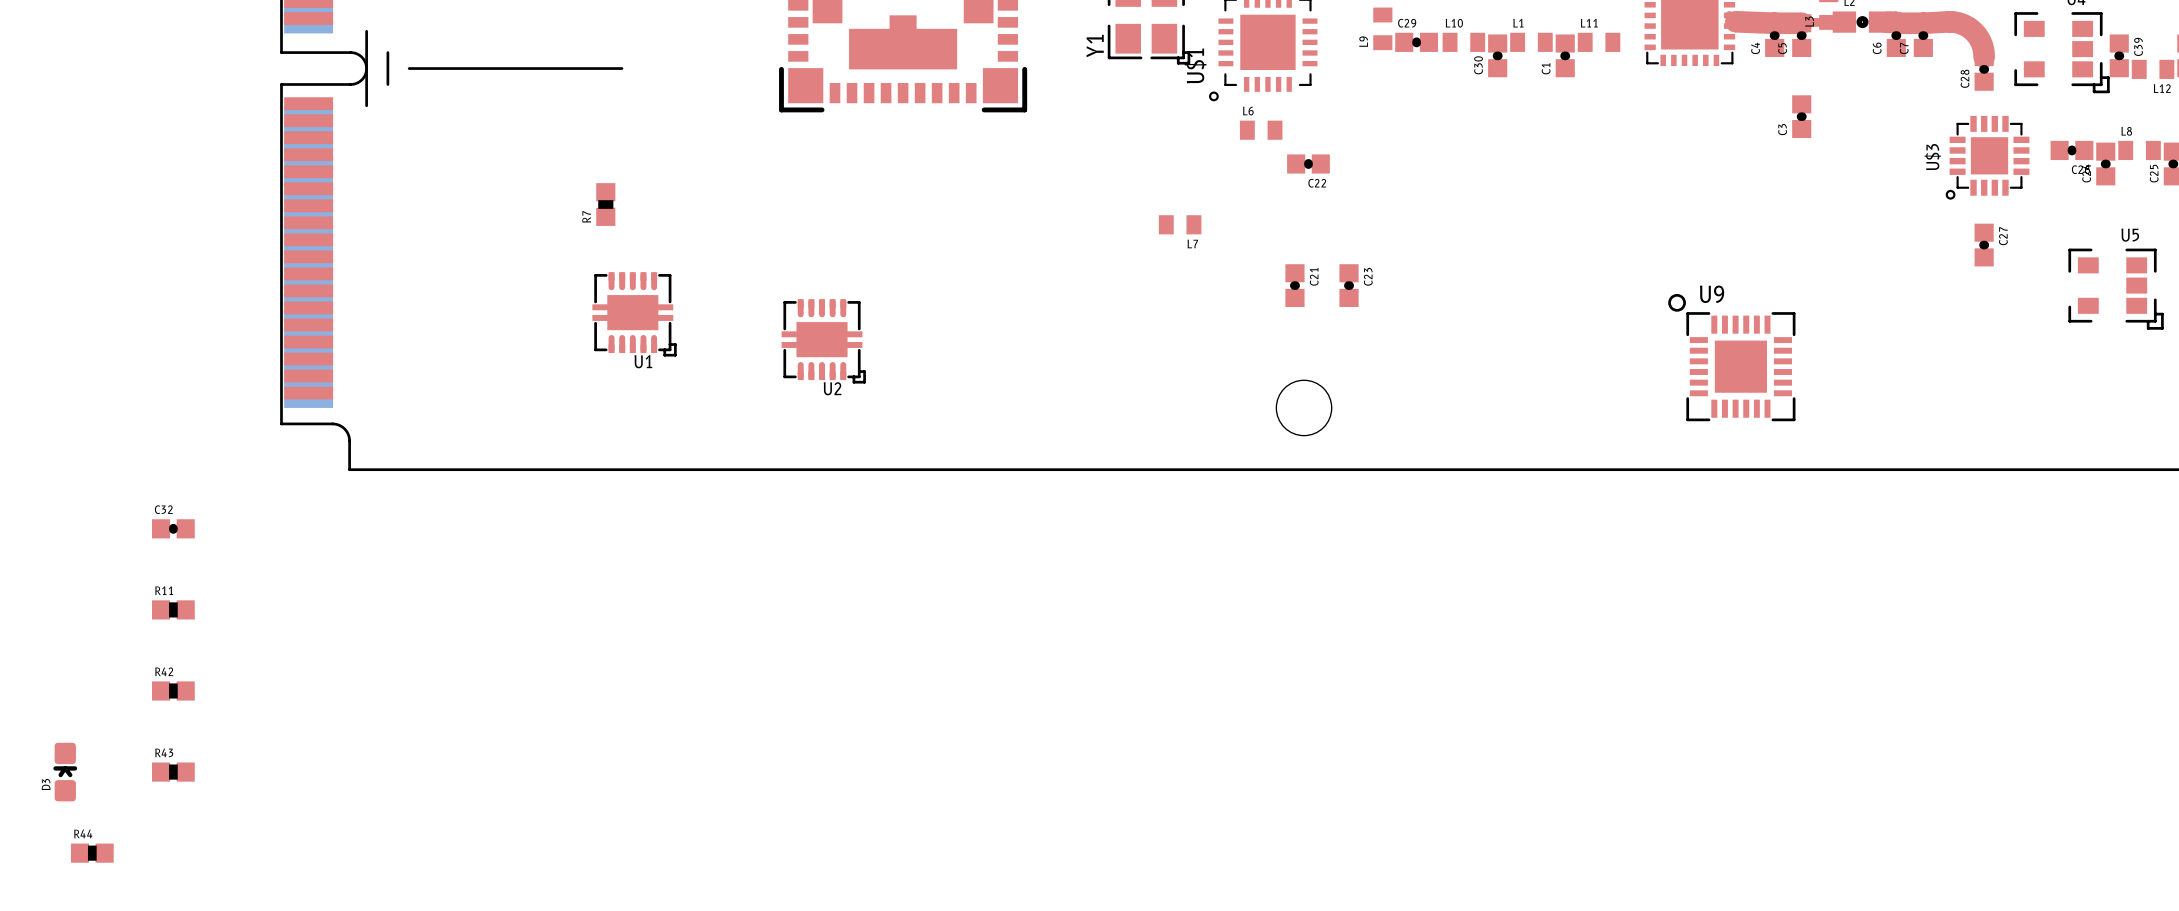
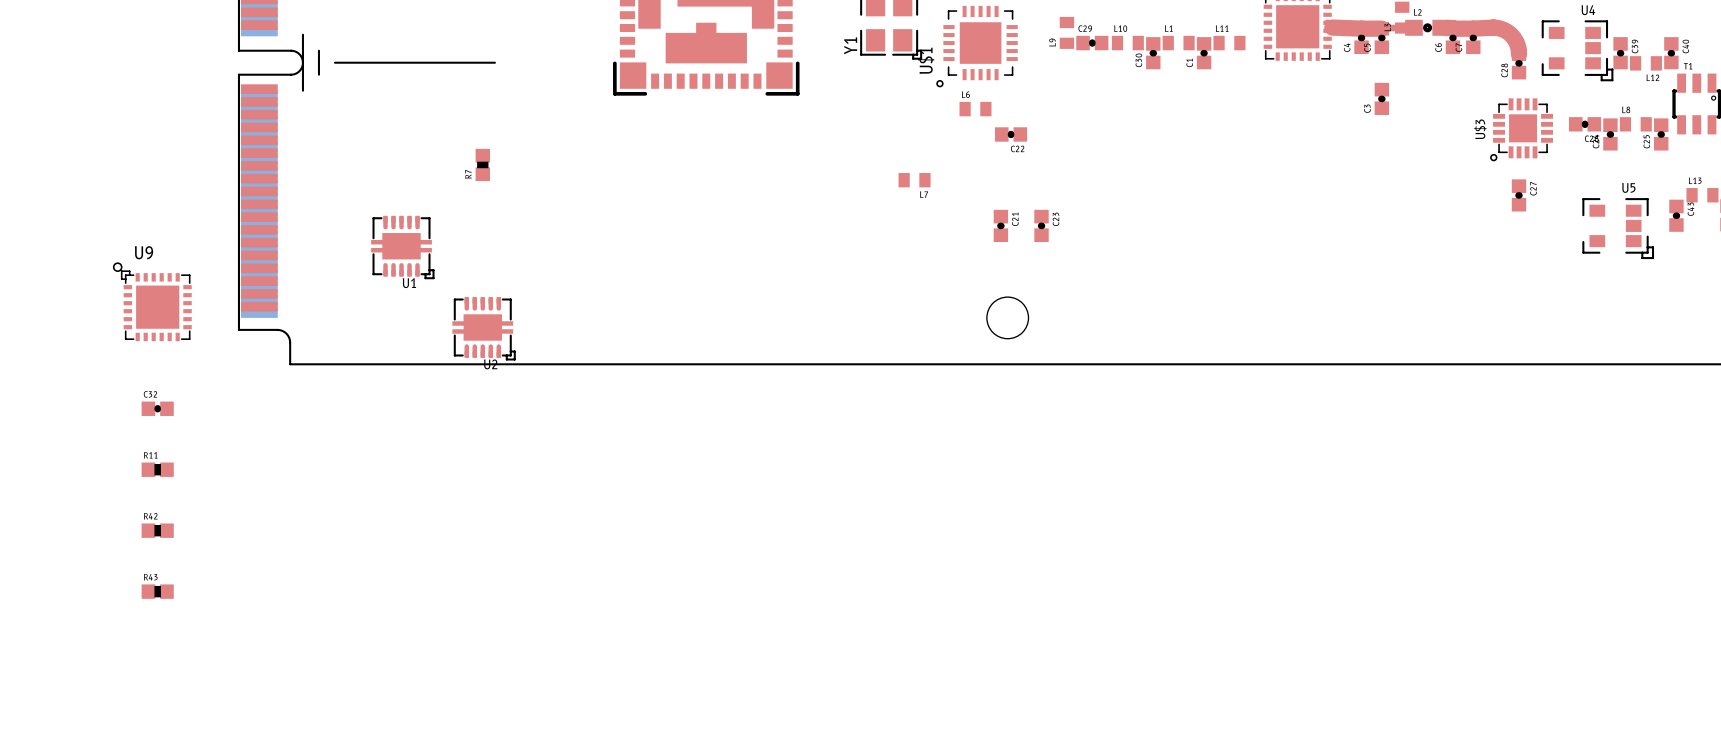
U9 footprint: [1668, 293, 1796, 422] -> [112, 262, 192, 342]
U1 position: (634, 314) -> (402, 247)
U2 position: (823, 341) -> (484, 328)
D3: (65, 772) -> none
R44: (92, 853) -> none

